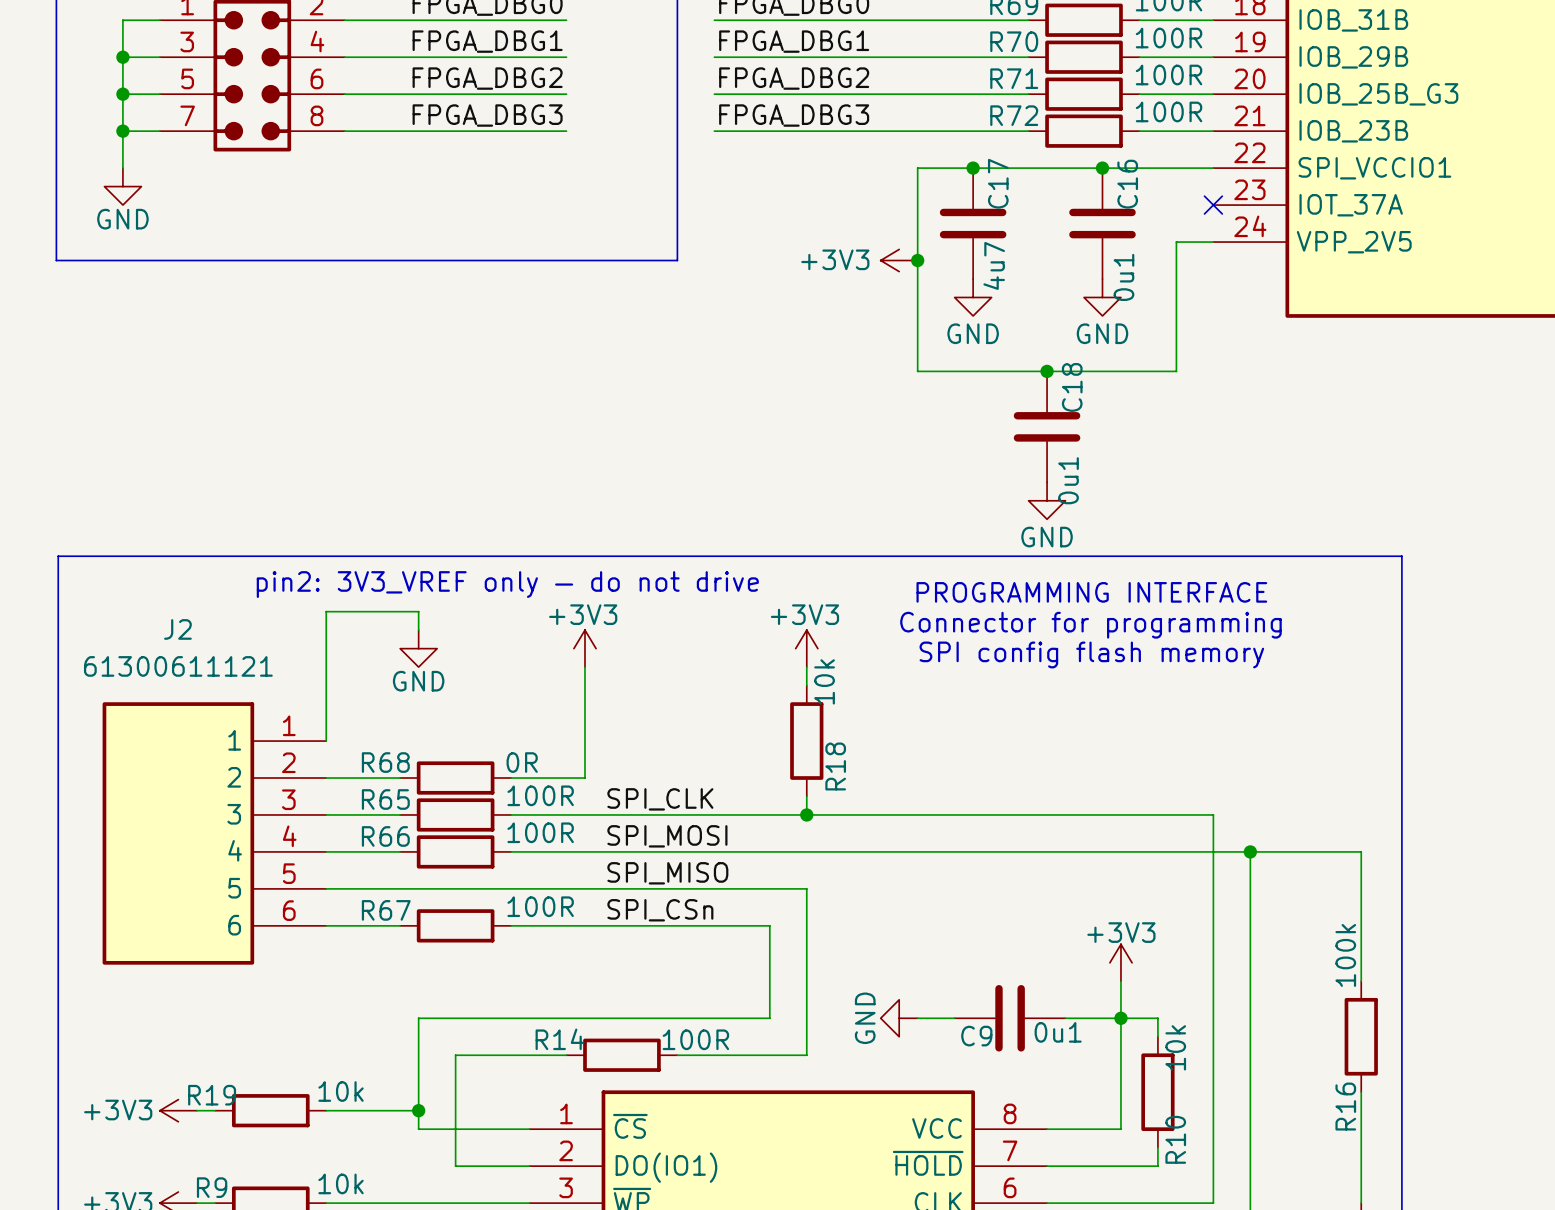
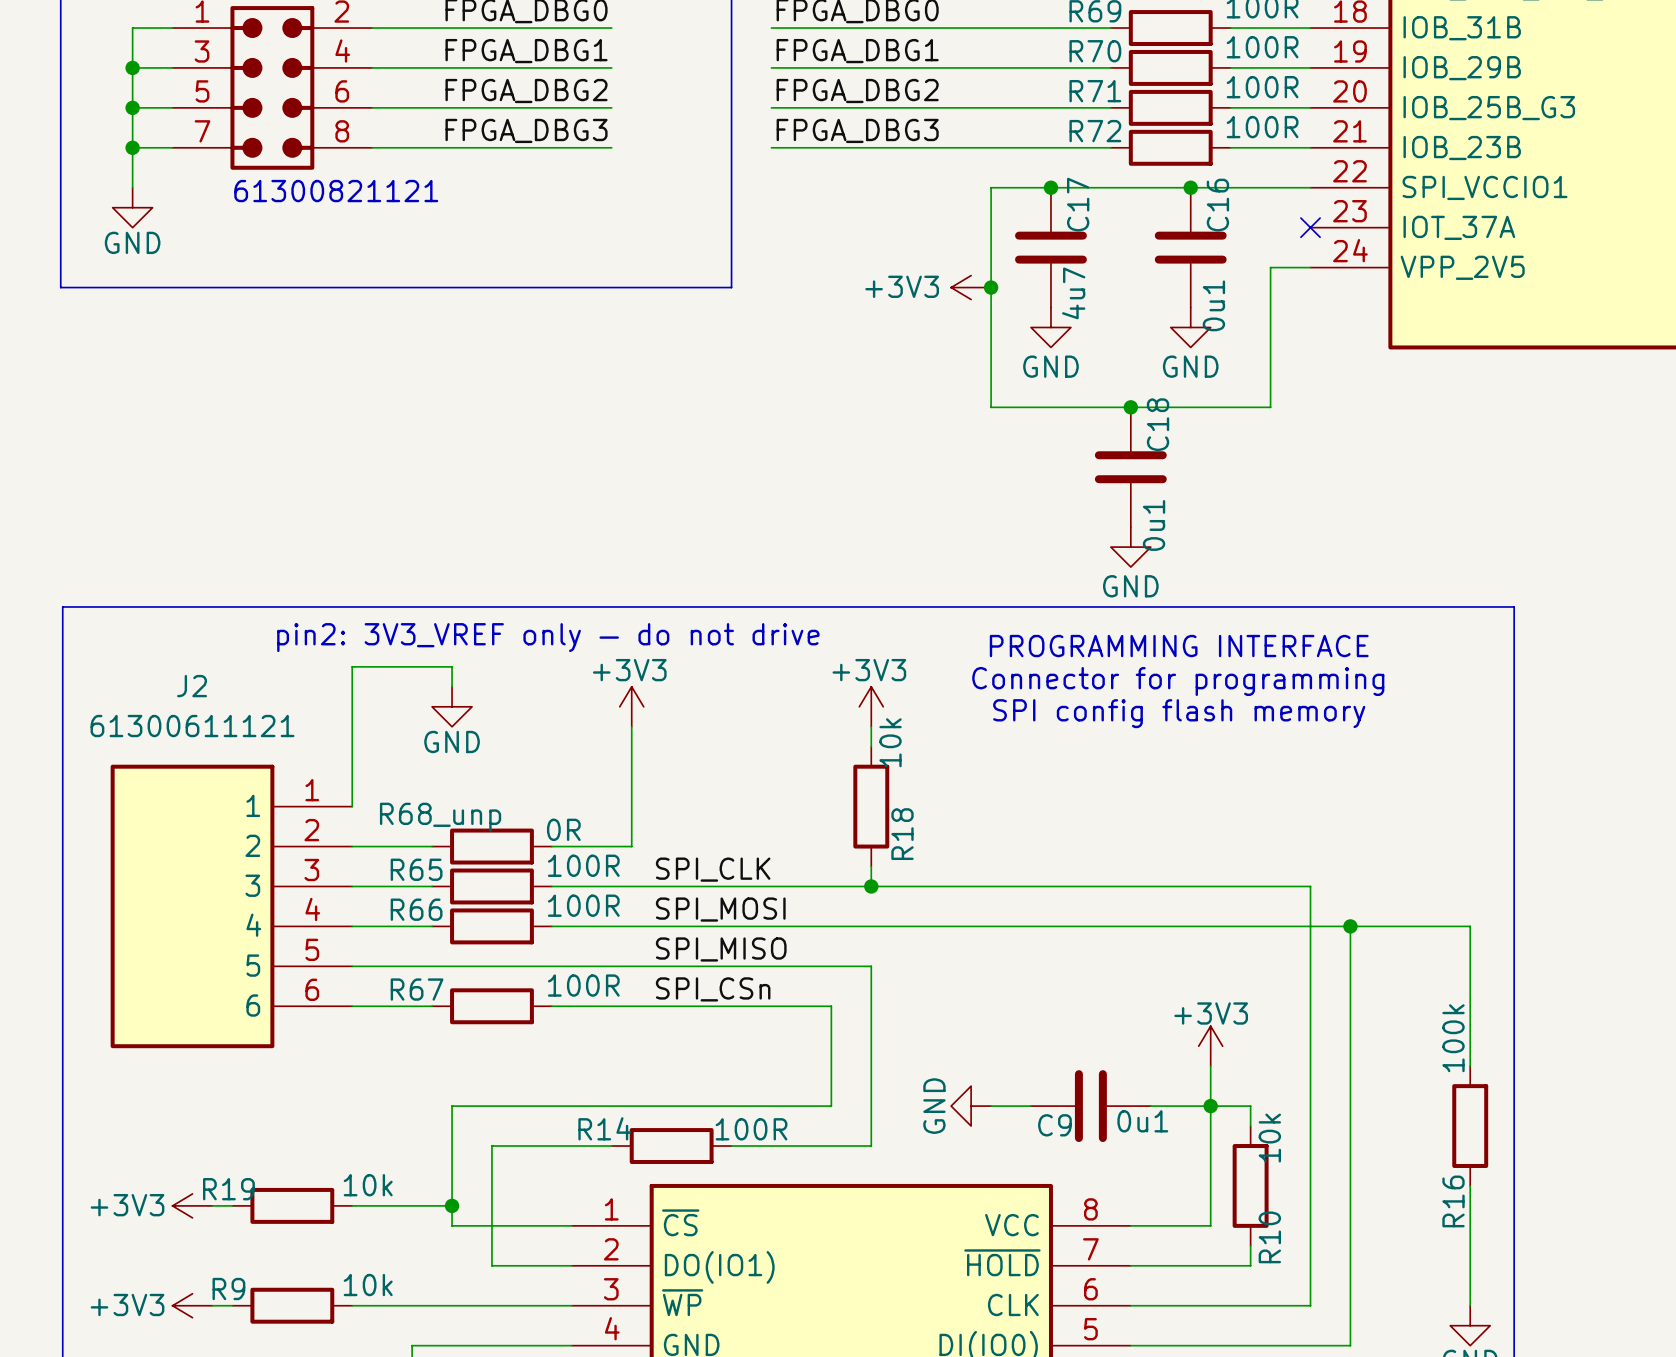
text: none -> 61300821121 (336, 191)
R68 name: R68 (385, 762) -> R68_unp (440, 817)

